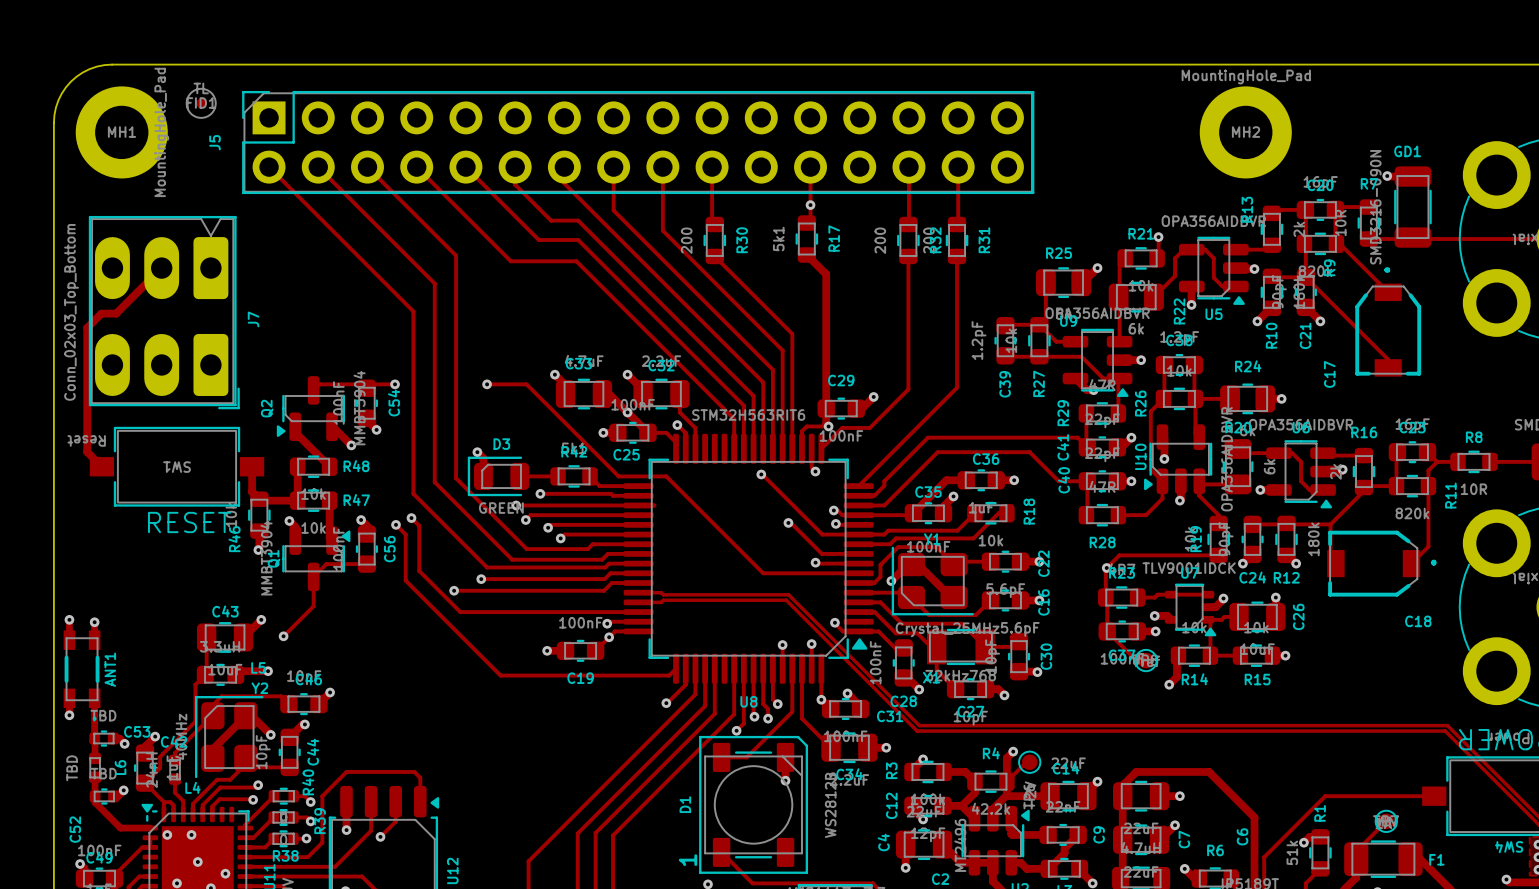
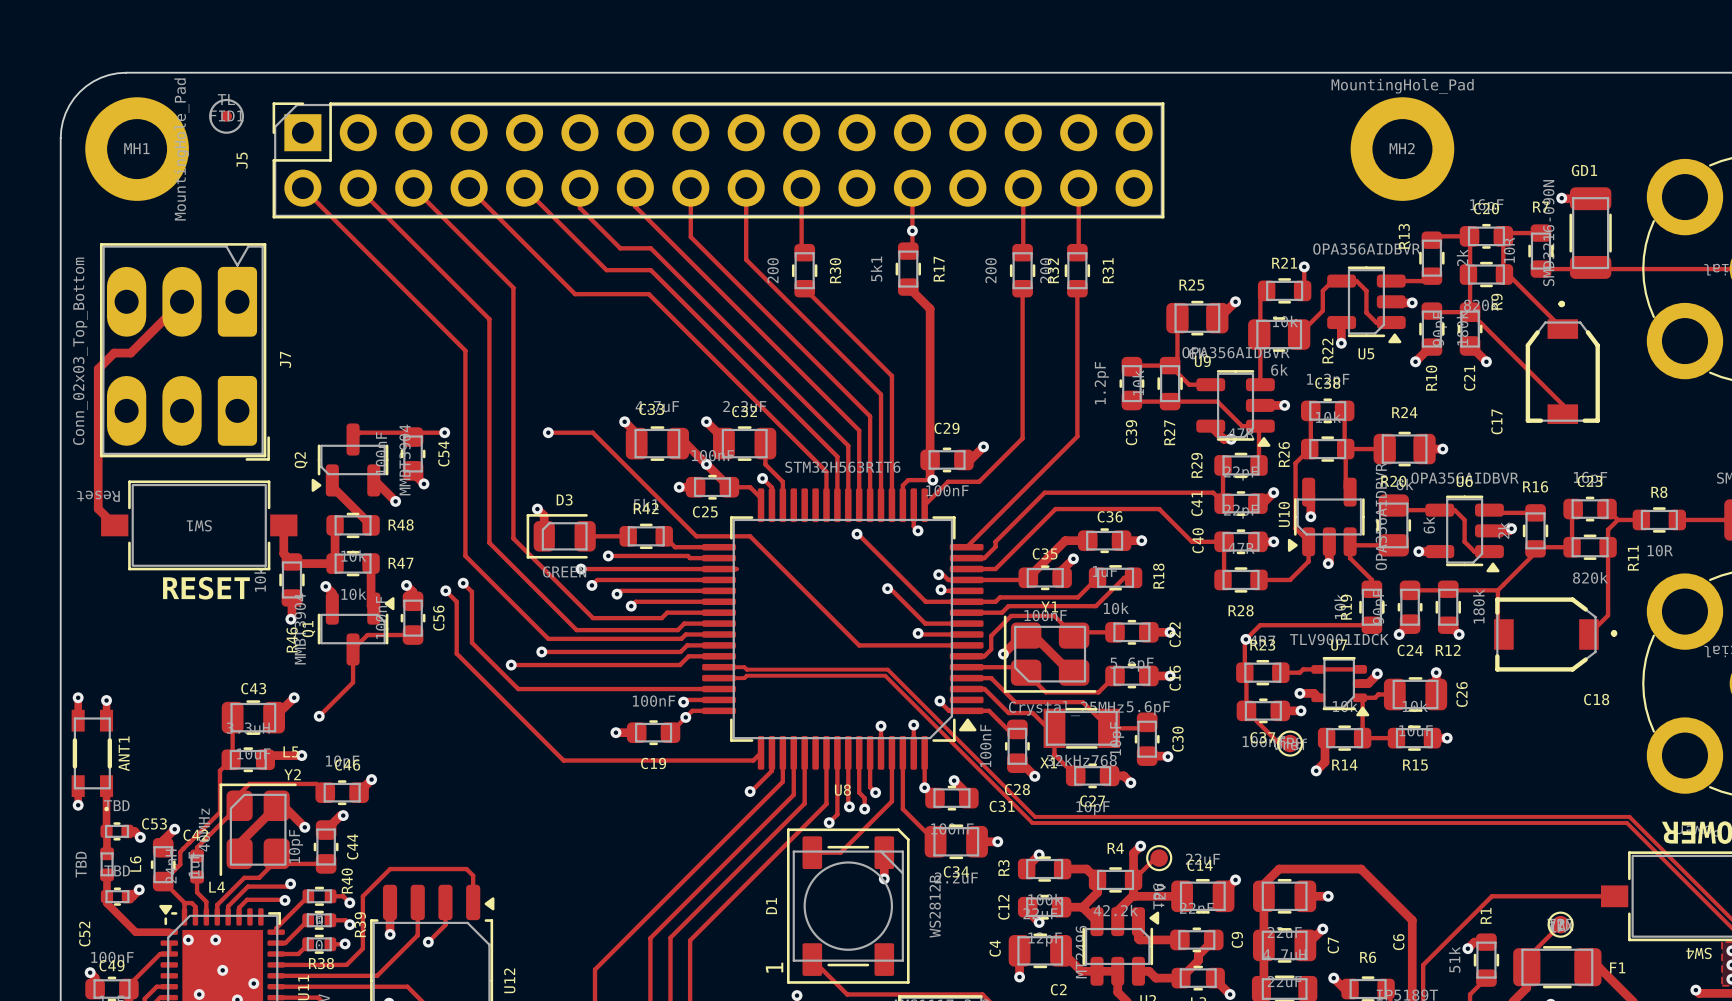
R46 name position: R46 (234, 539) -> R46 (292, 639)

